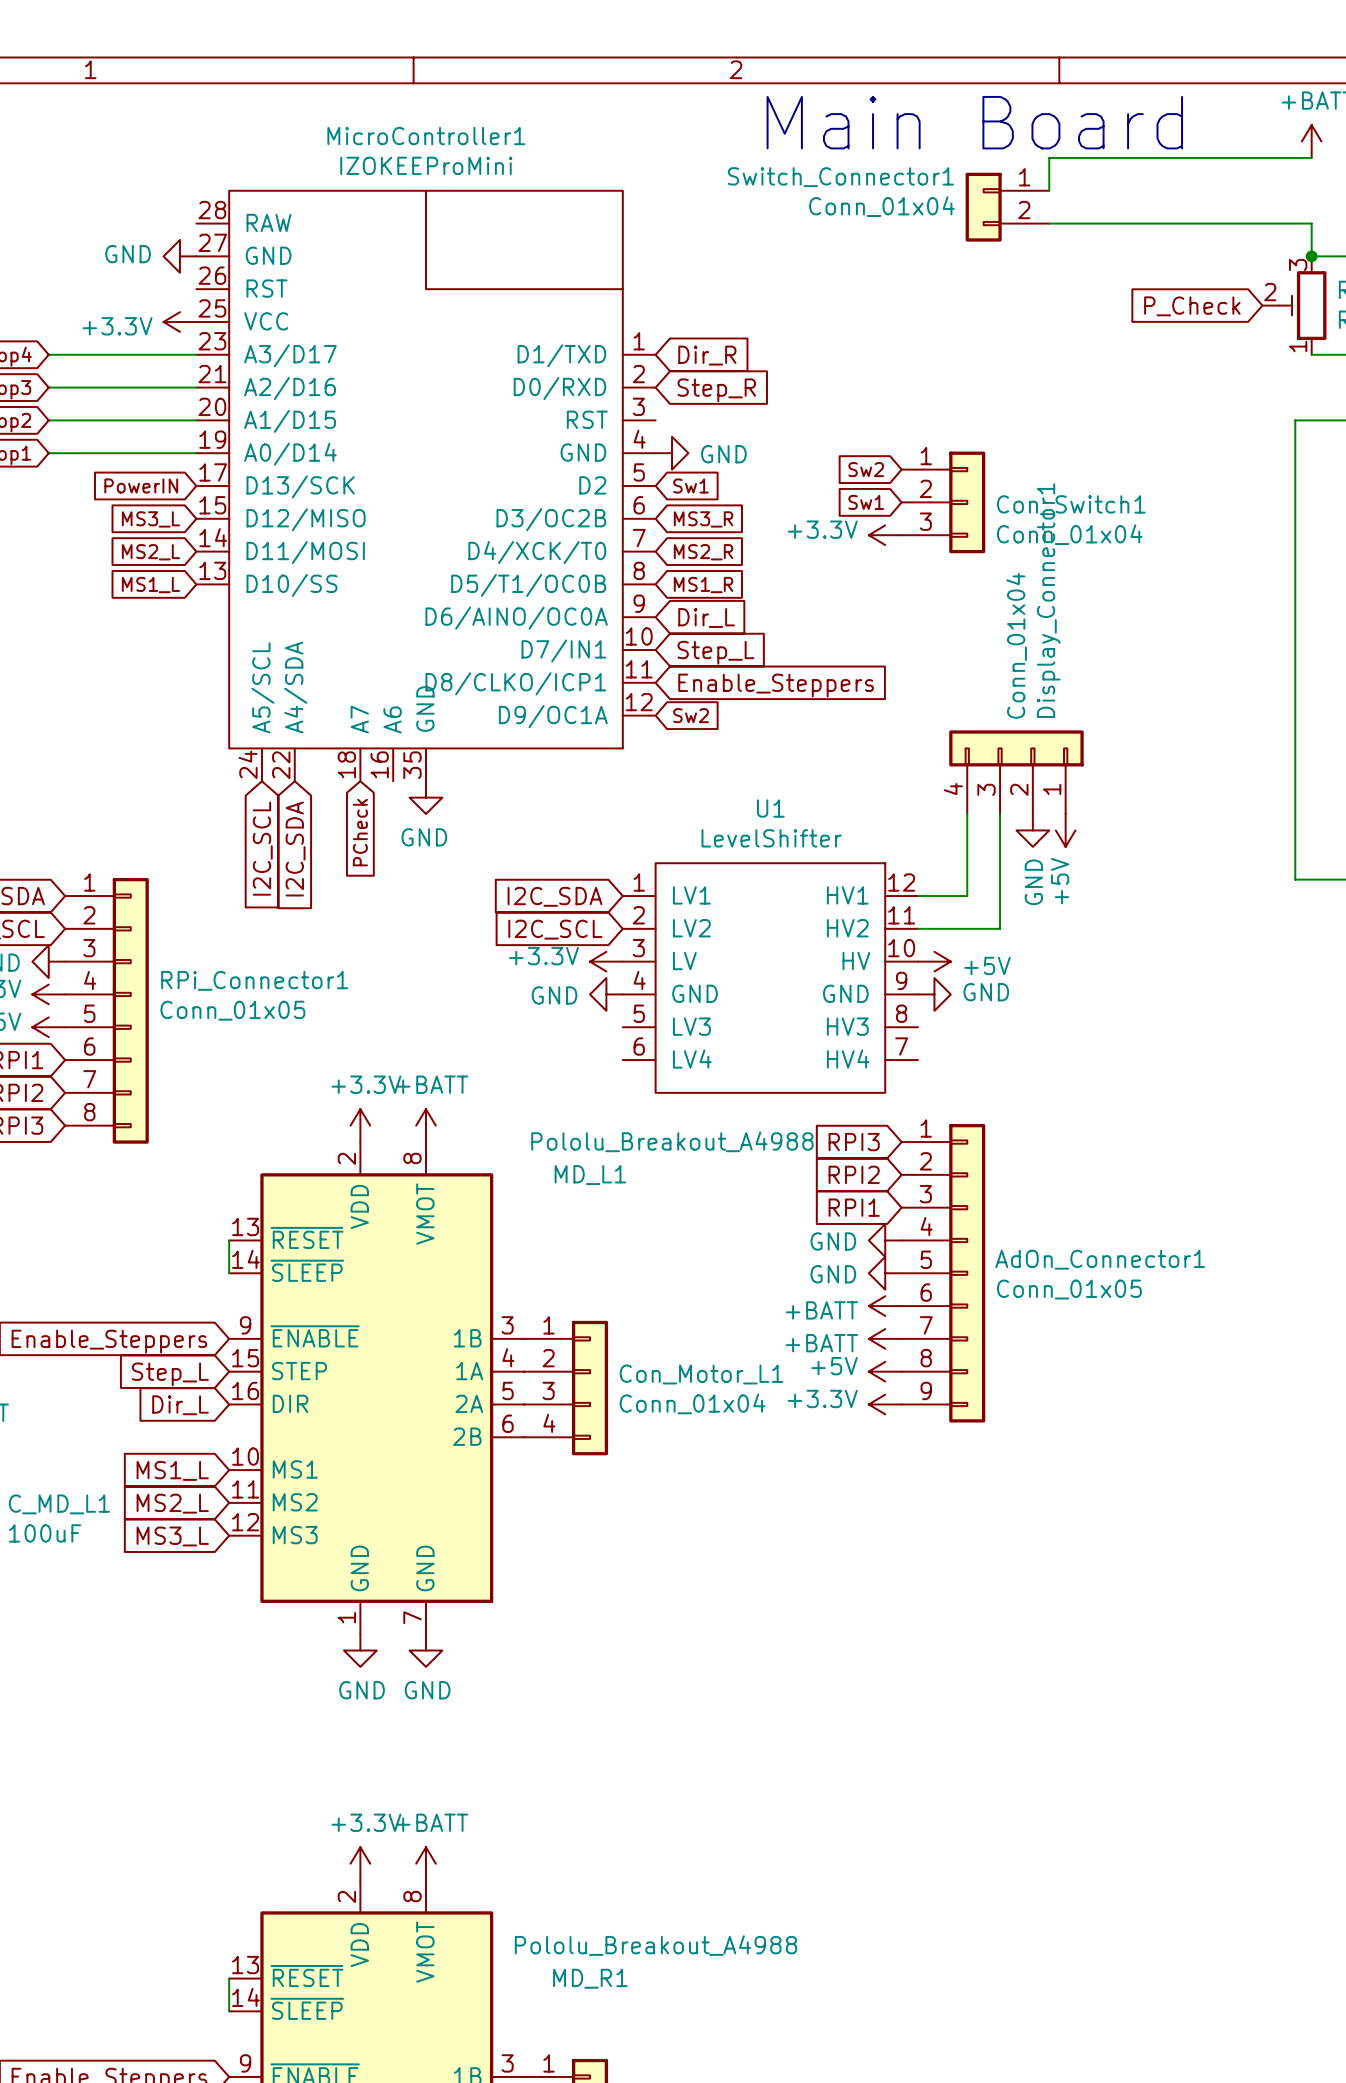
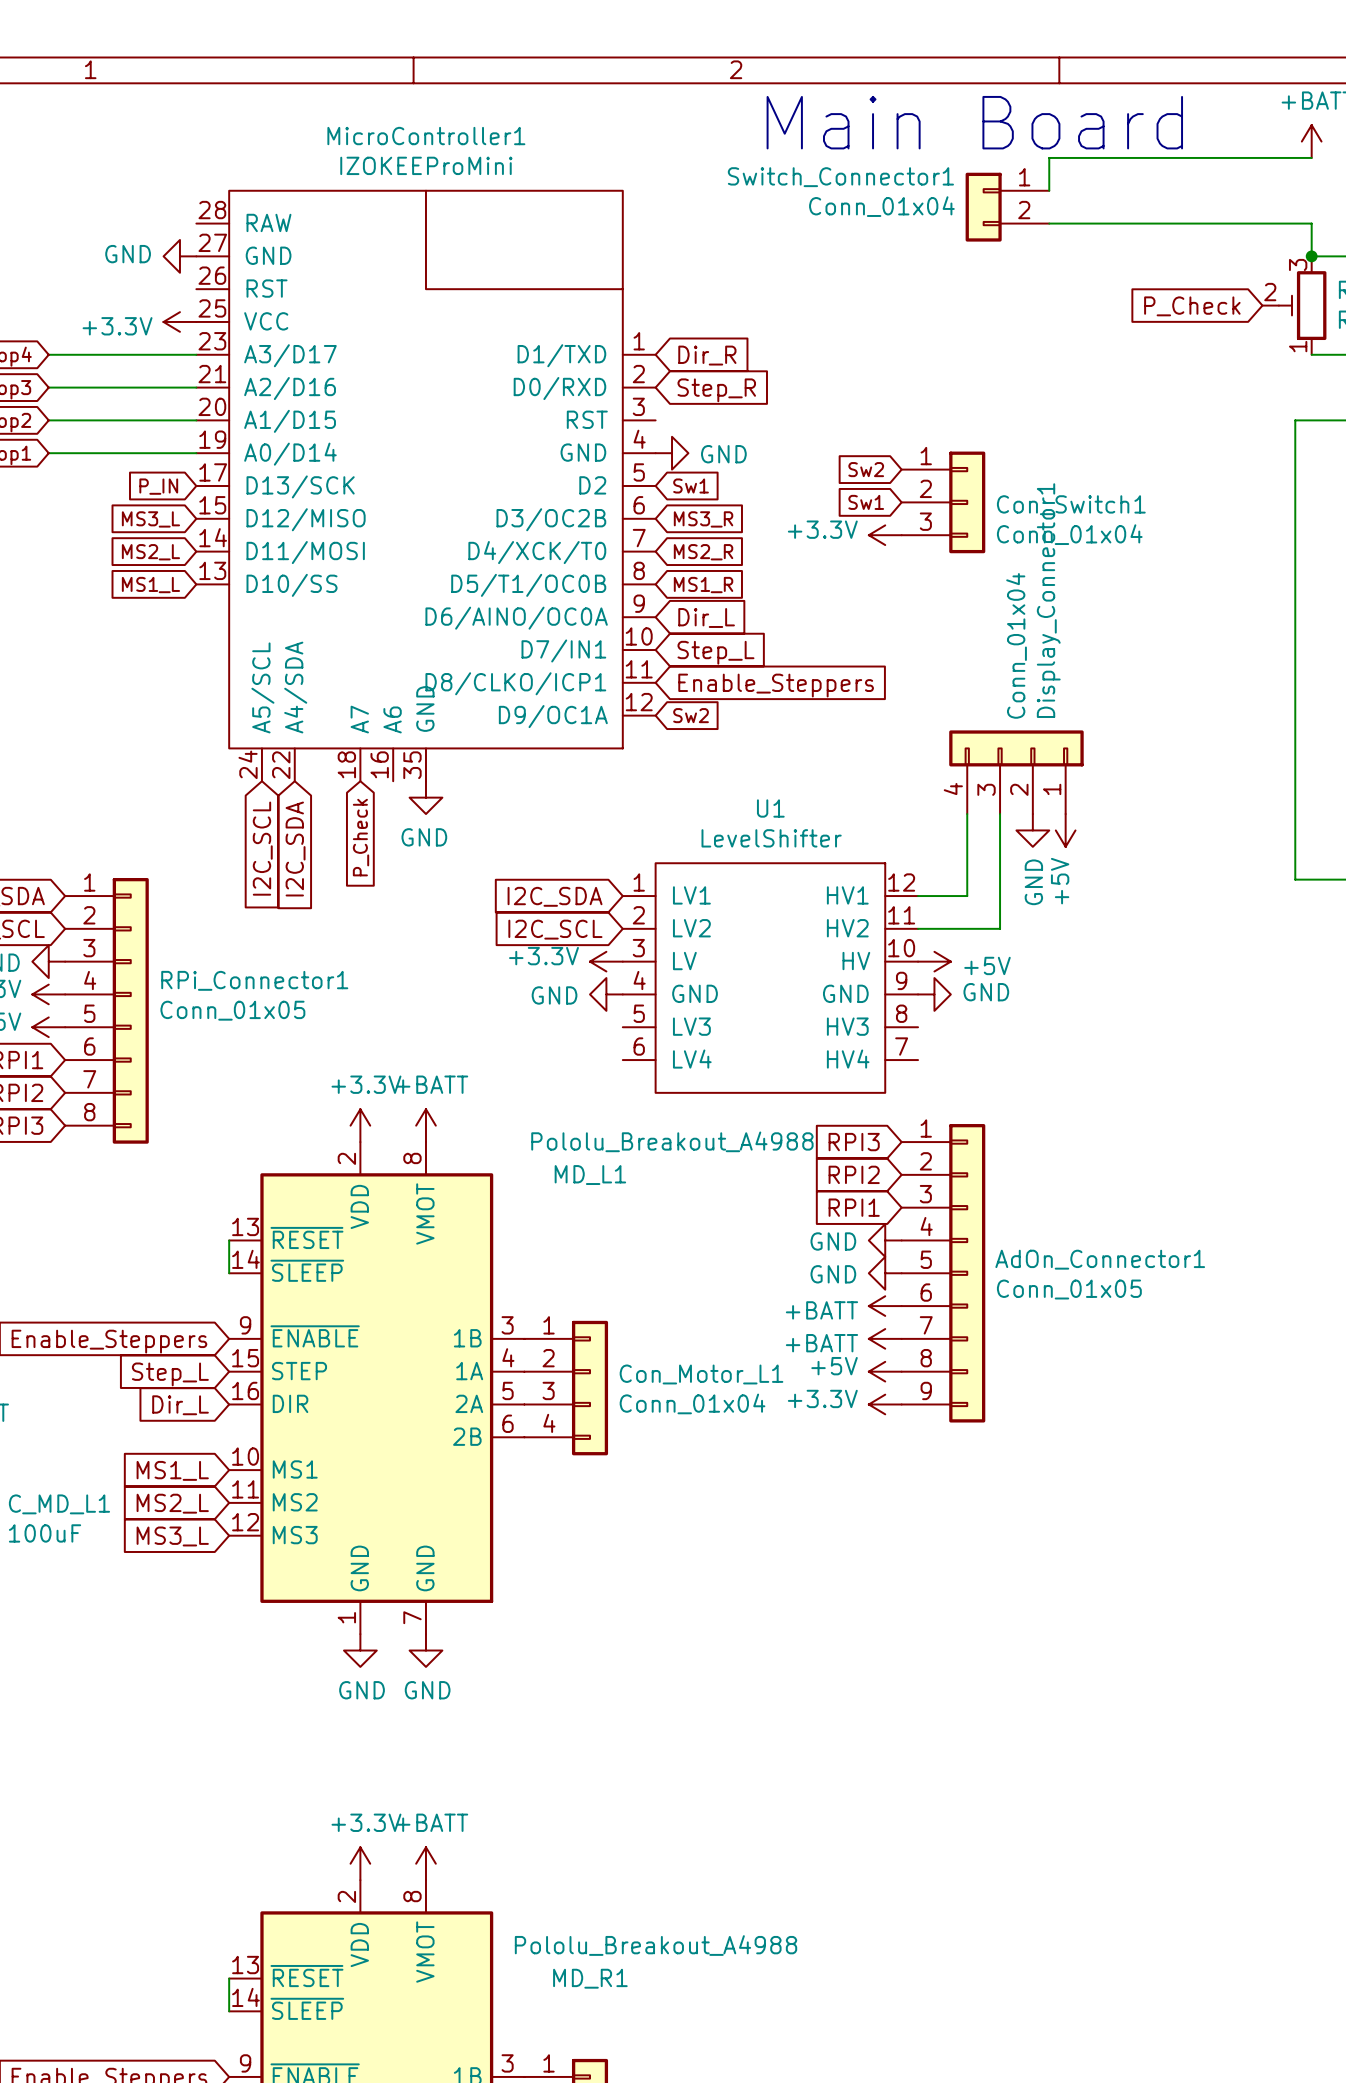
global label: PowerIN (141, 485) -> P_IN (158, 486)
global label: PCheck (360, 832) -> P_Check (361, 837)

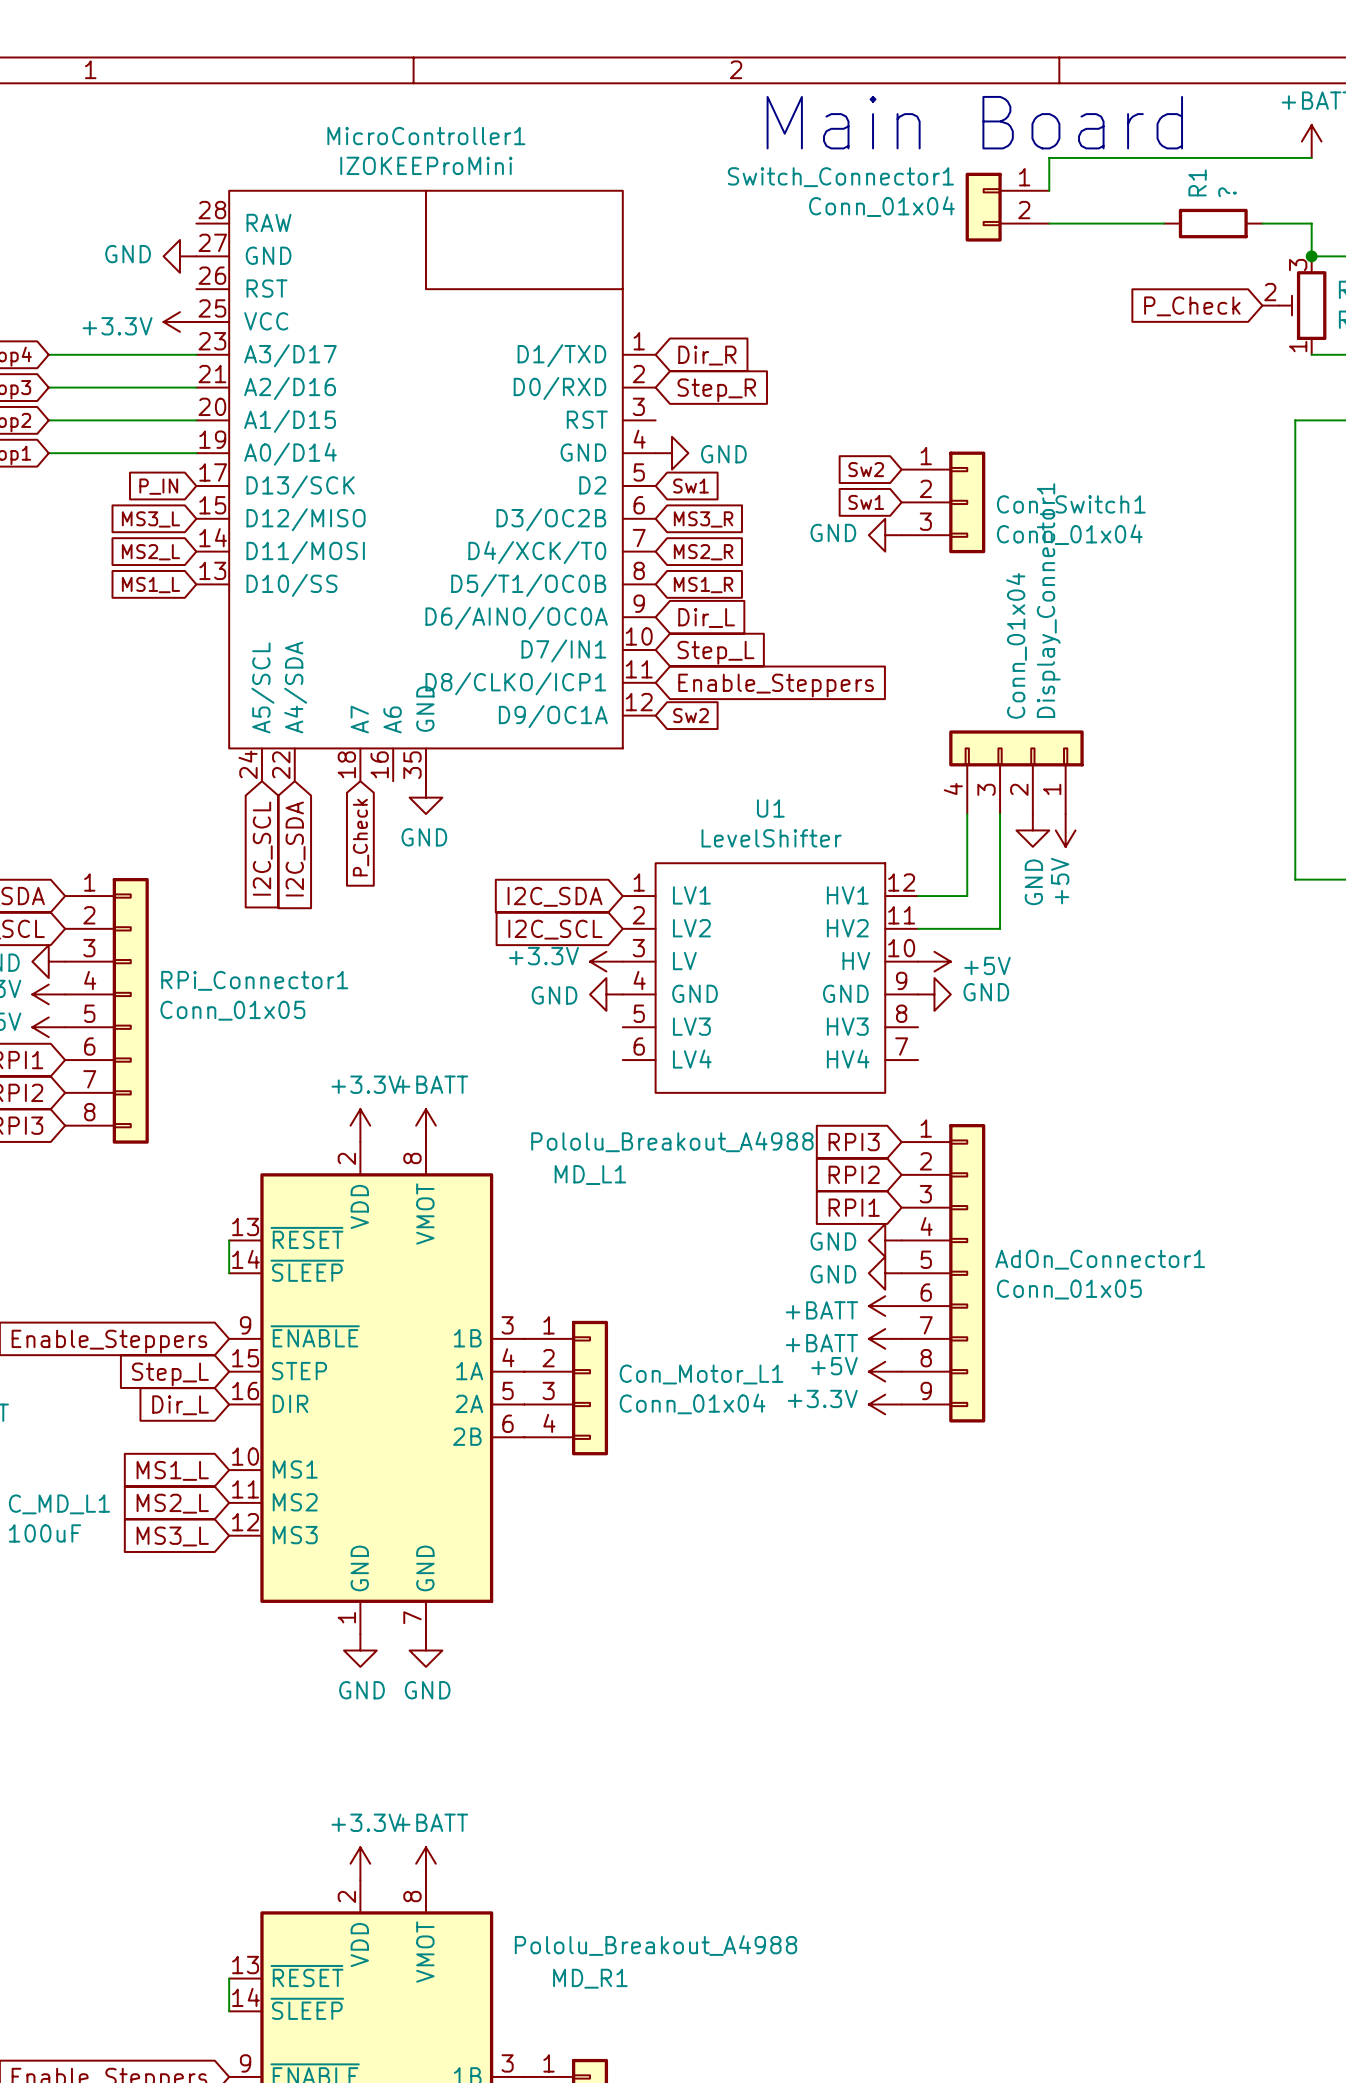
wire: (1164, 223) (1262, 223) -> none
R1: none -> ? (1213, 223)
power symbol: +3.3V (885, 535) -> GND (885, 535)

